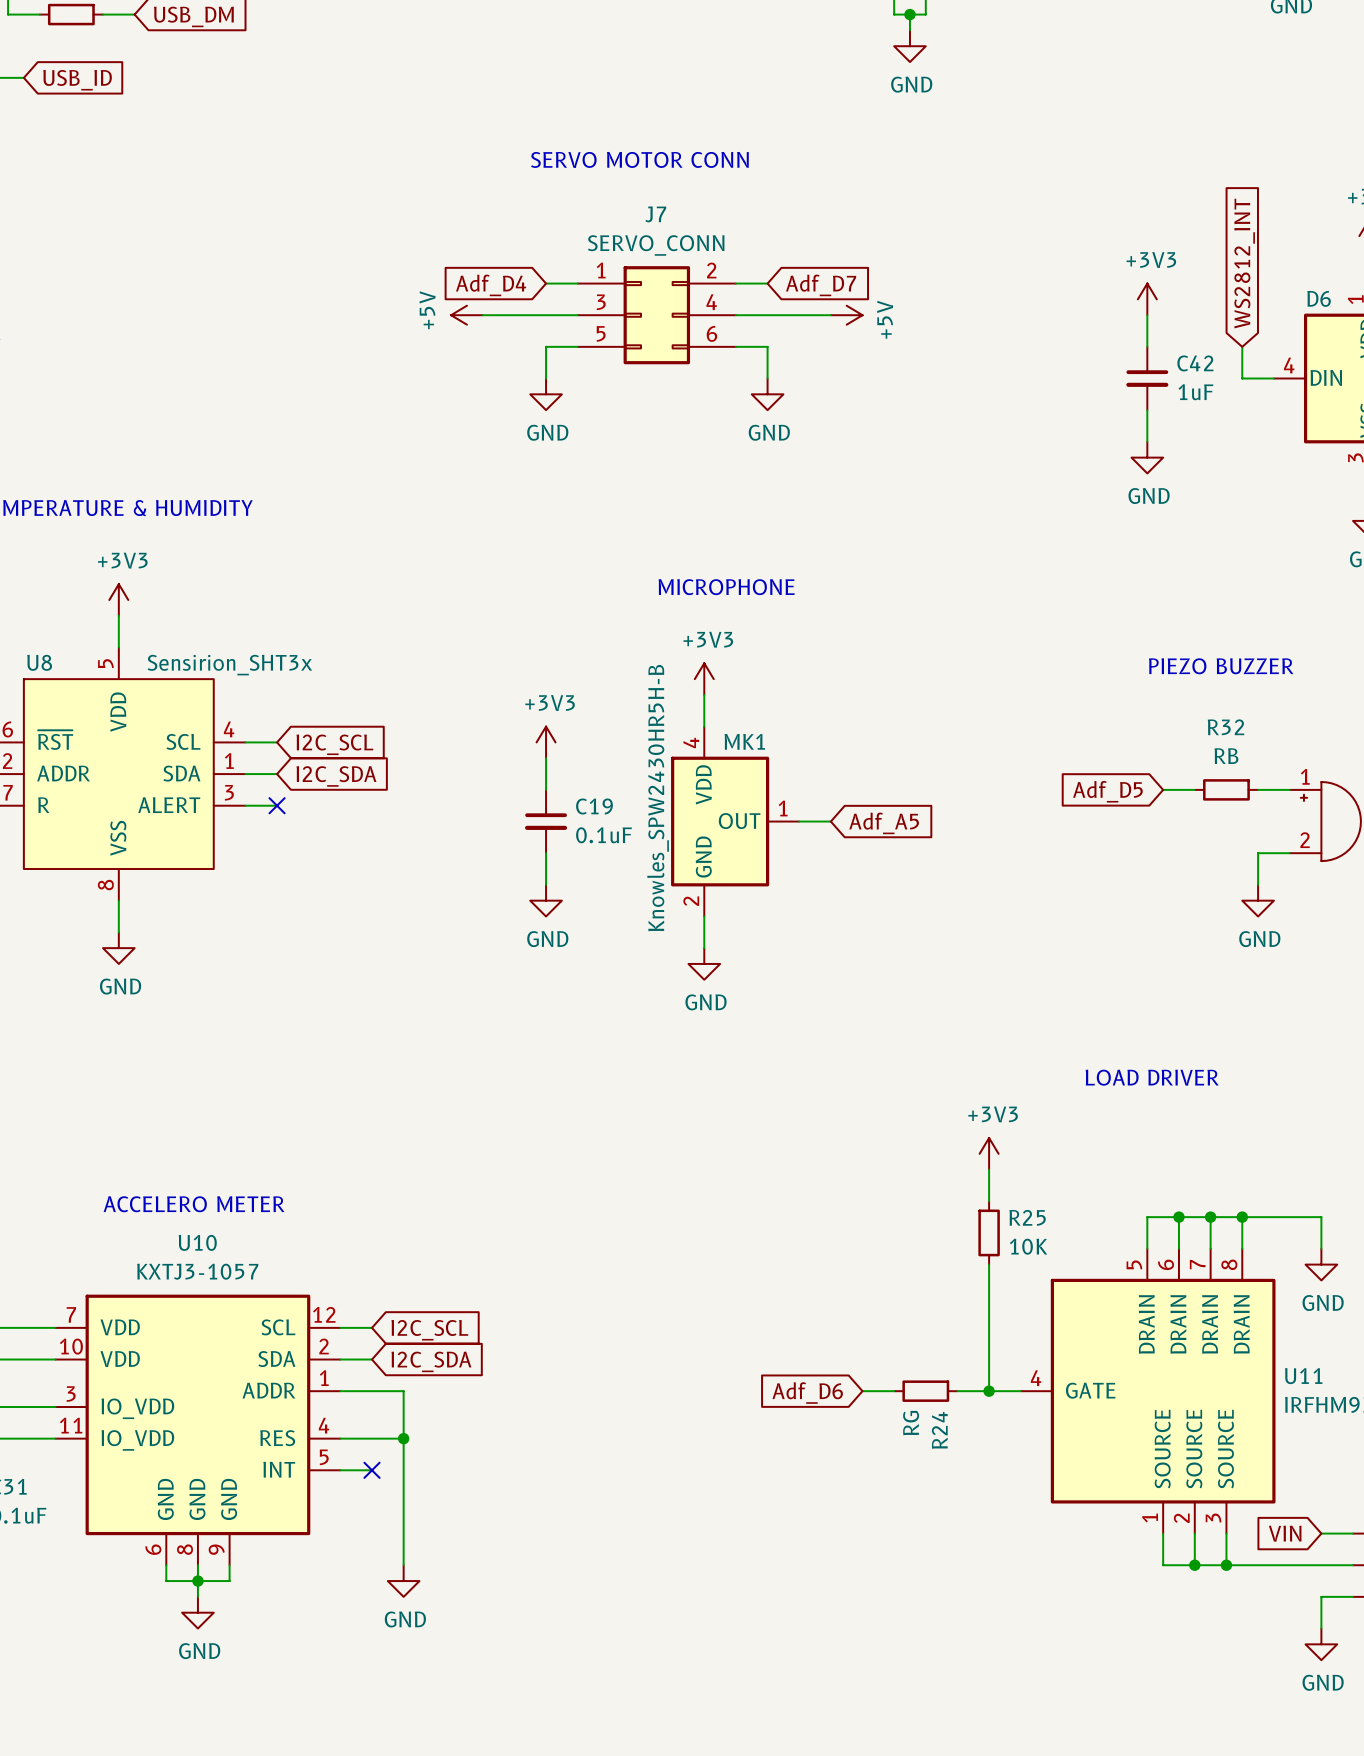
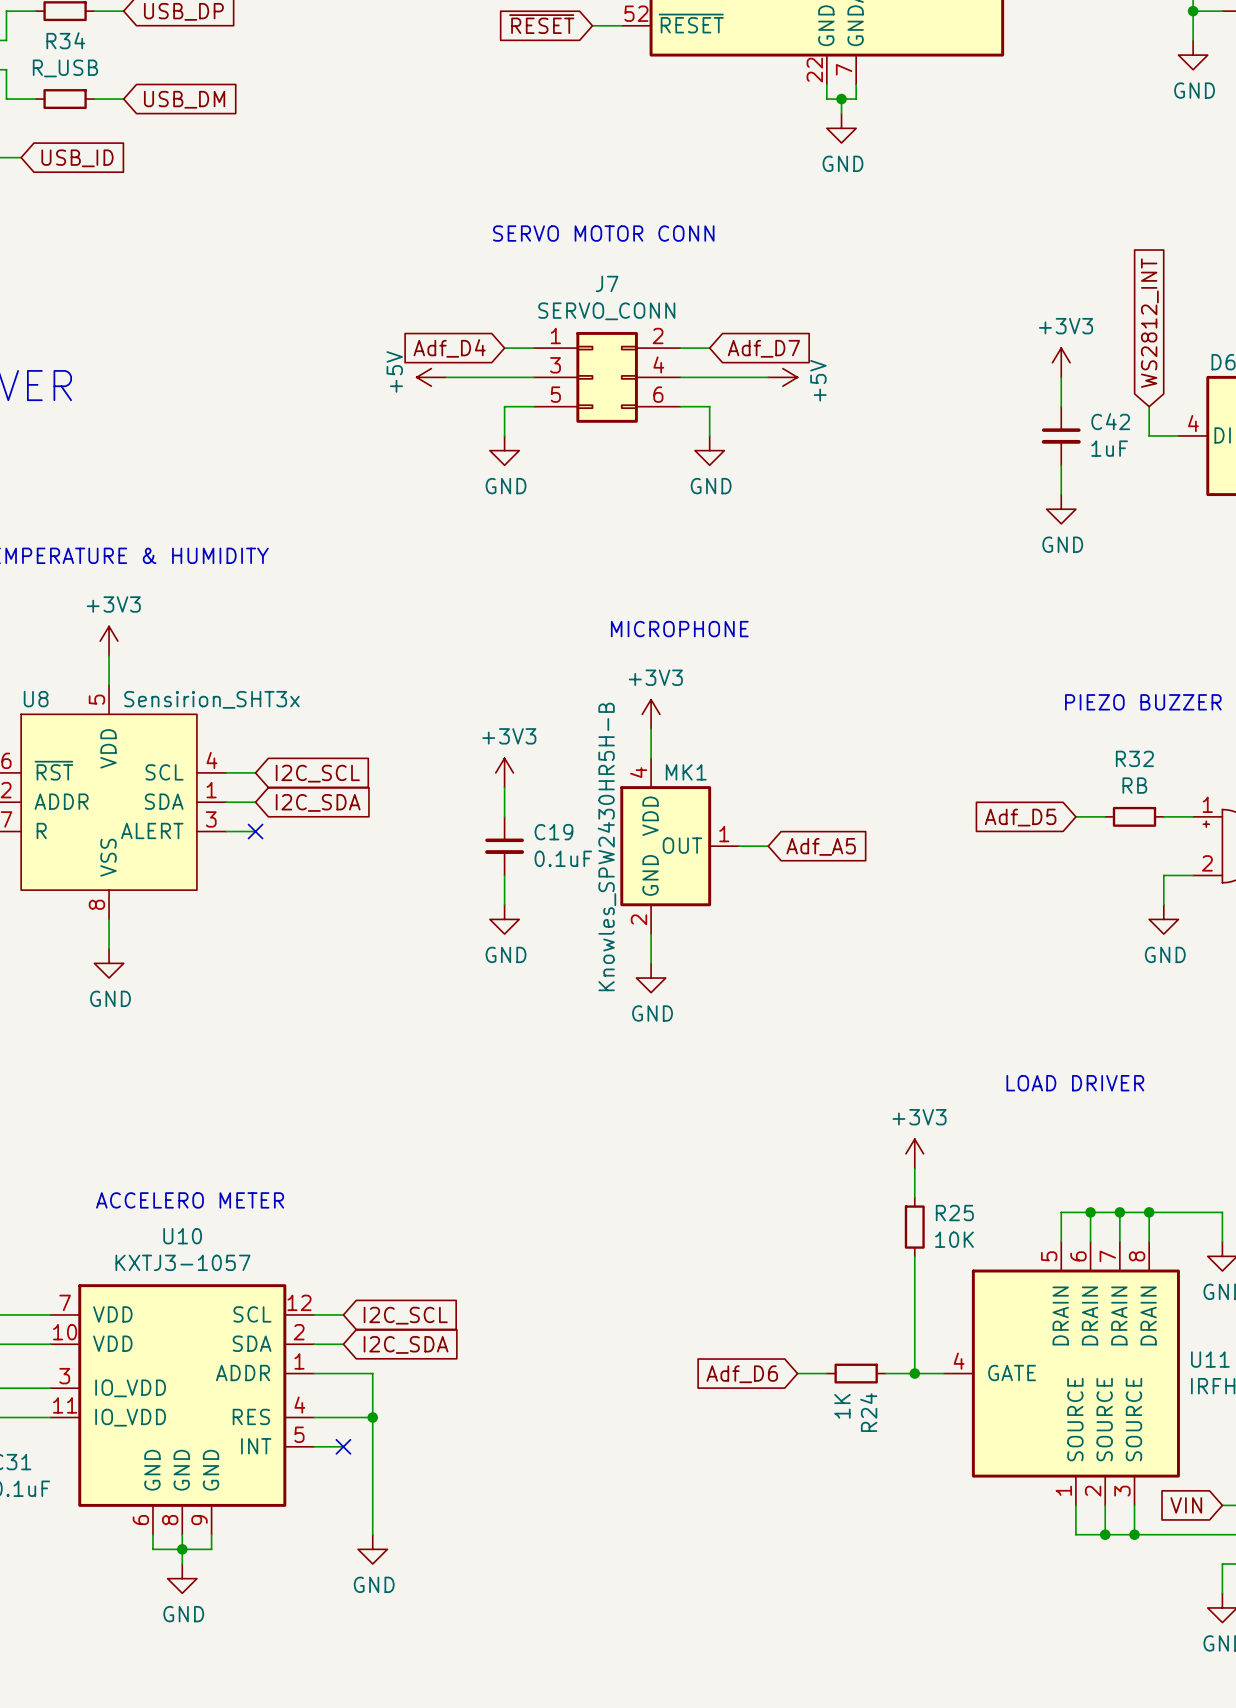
R24 value: RG (911, 1423) -> 1K (842, 1406)

